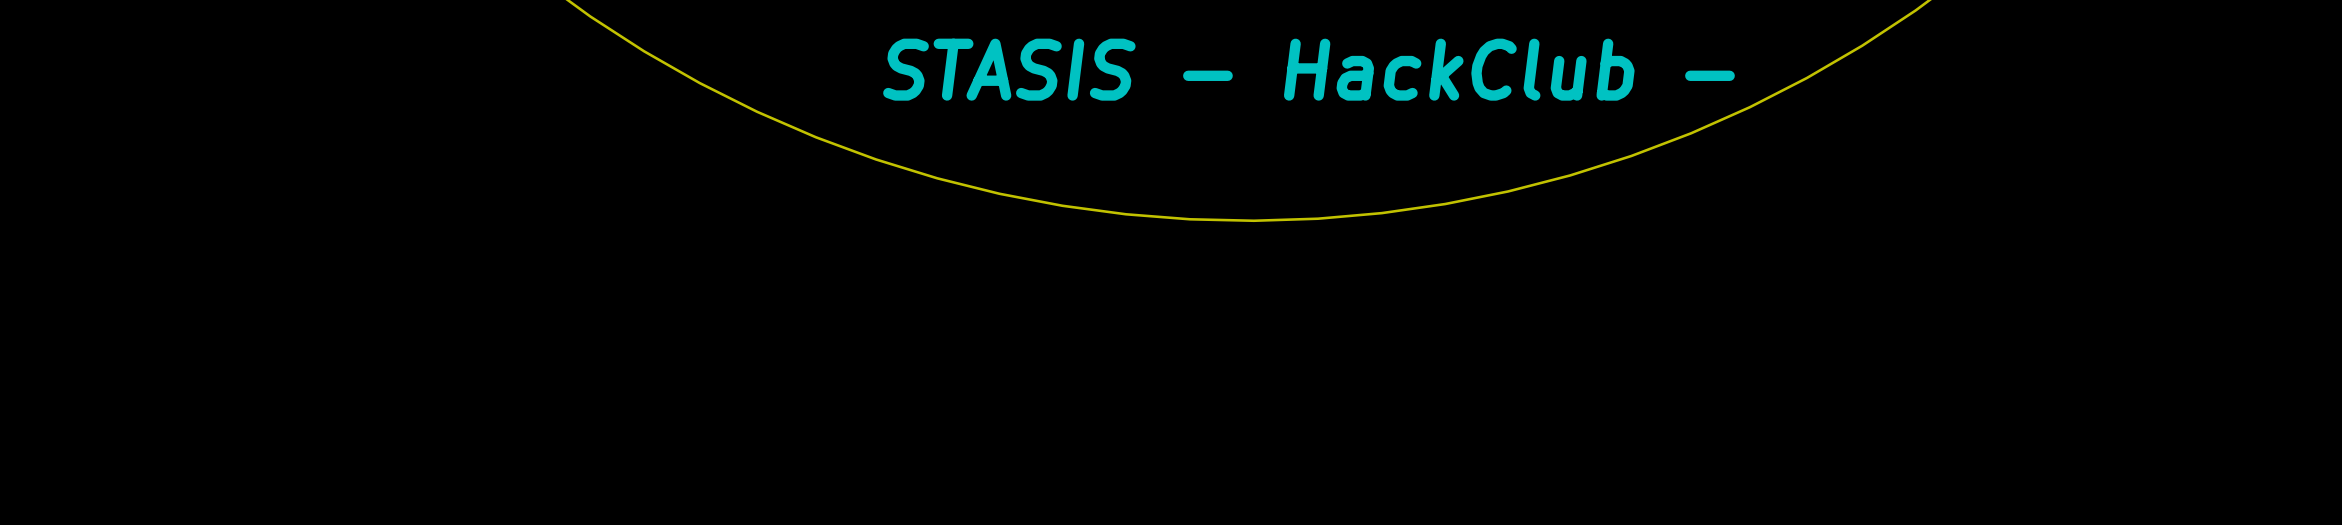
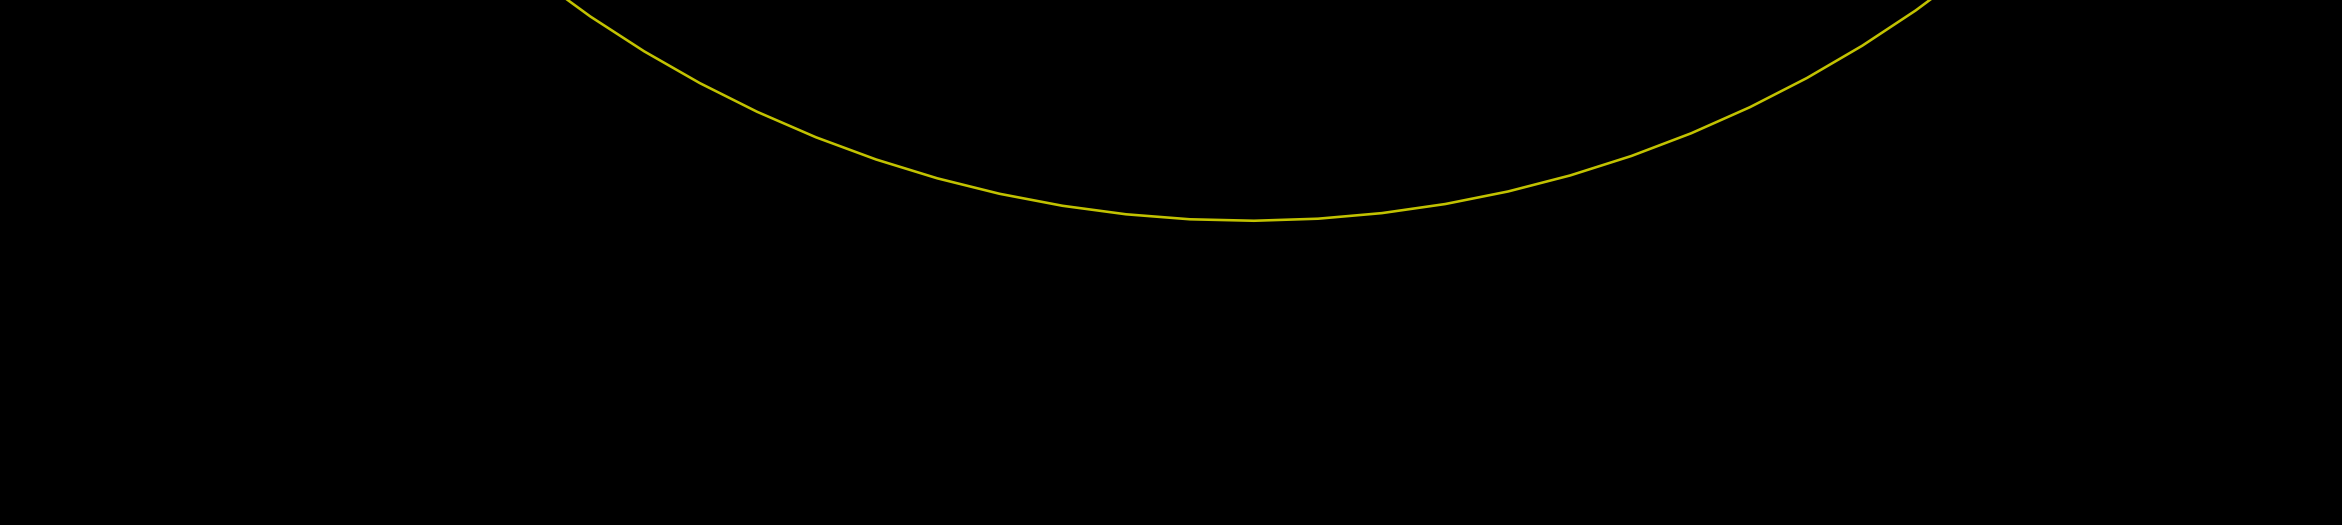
text: STASIS - HackClub - (1309, 69) -> none

